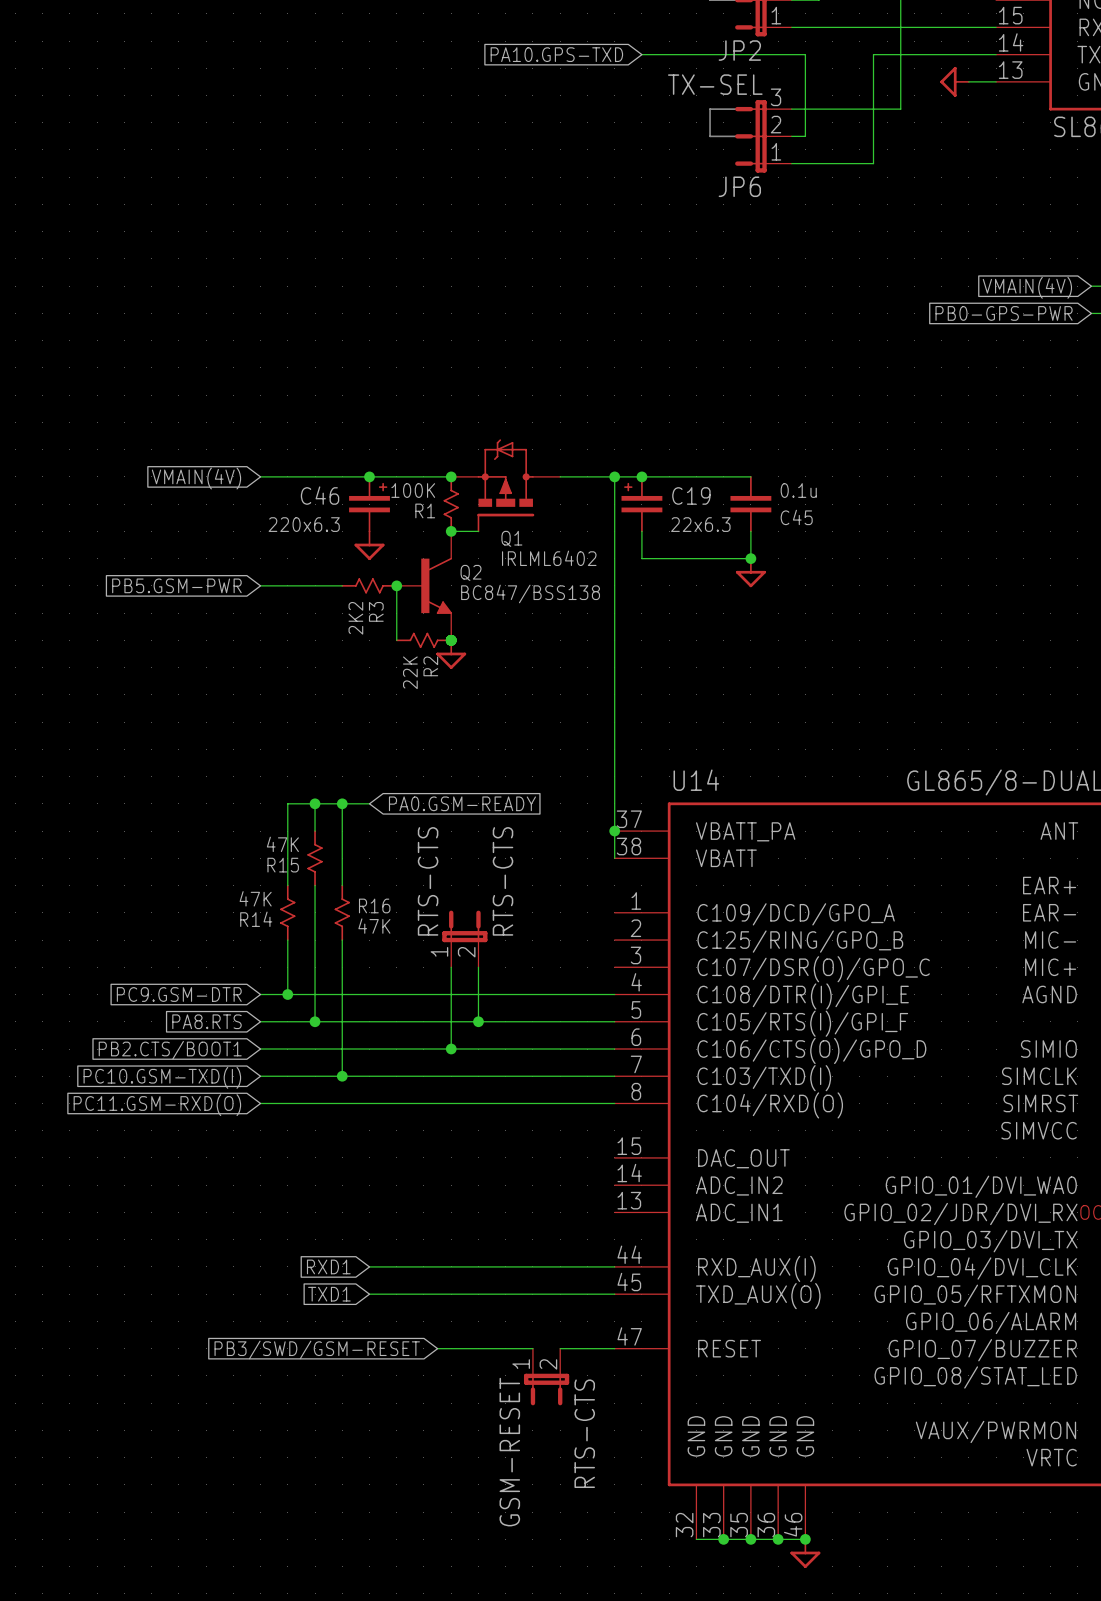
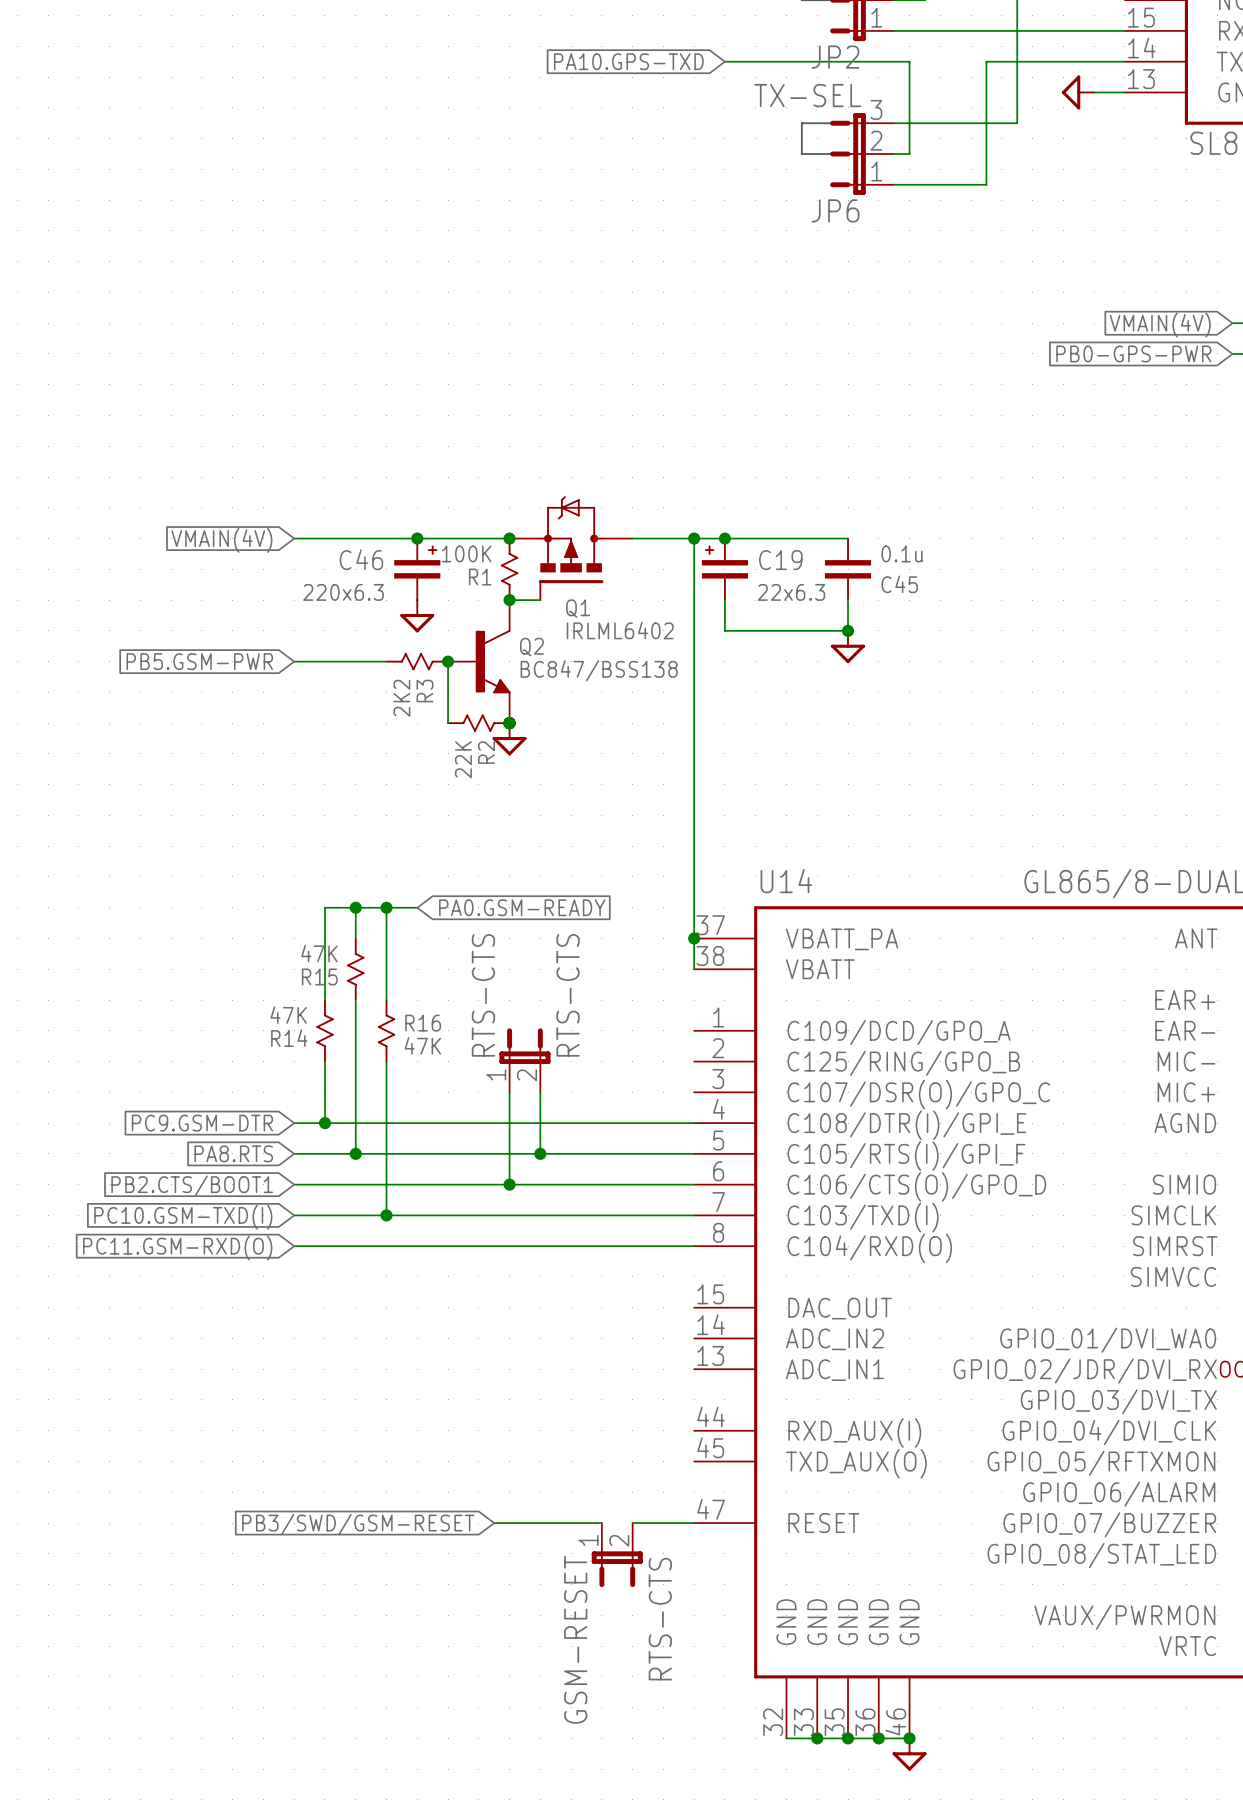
global label: RXD1 (328, 1266) -> none
wire: (369, 1266) (614, 1266) -> none
global label: TXD1 (329, 1294) -> none
wire: (369, 1294) (614, 1294) -> none

